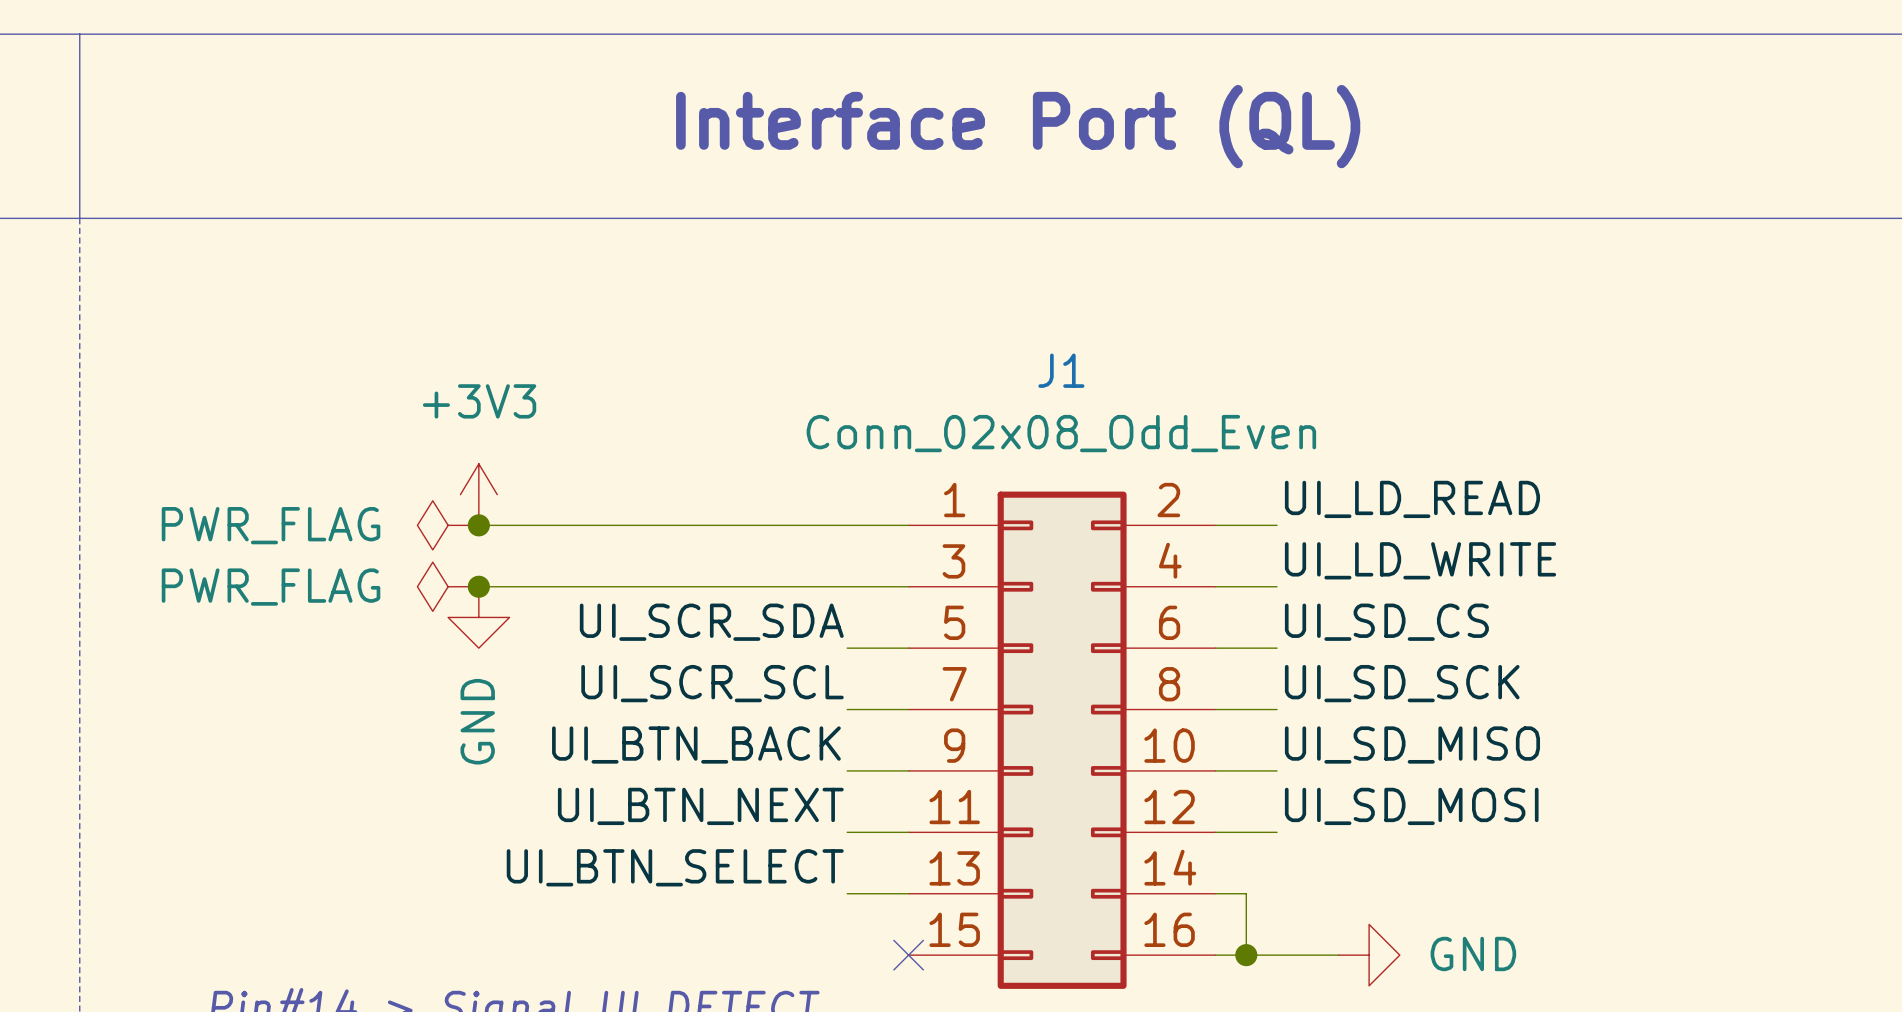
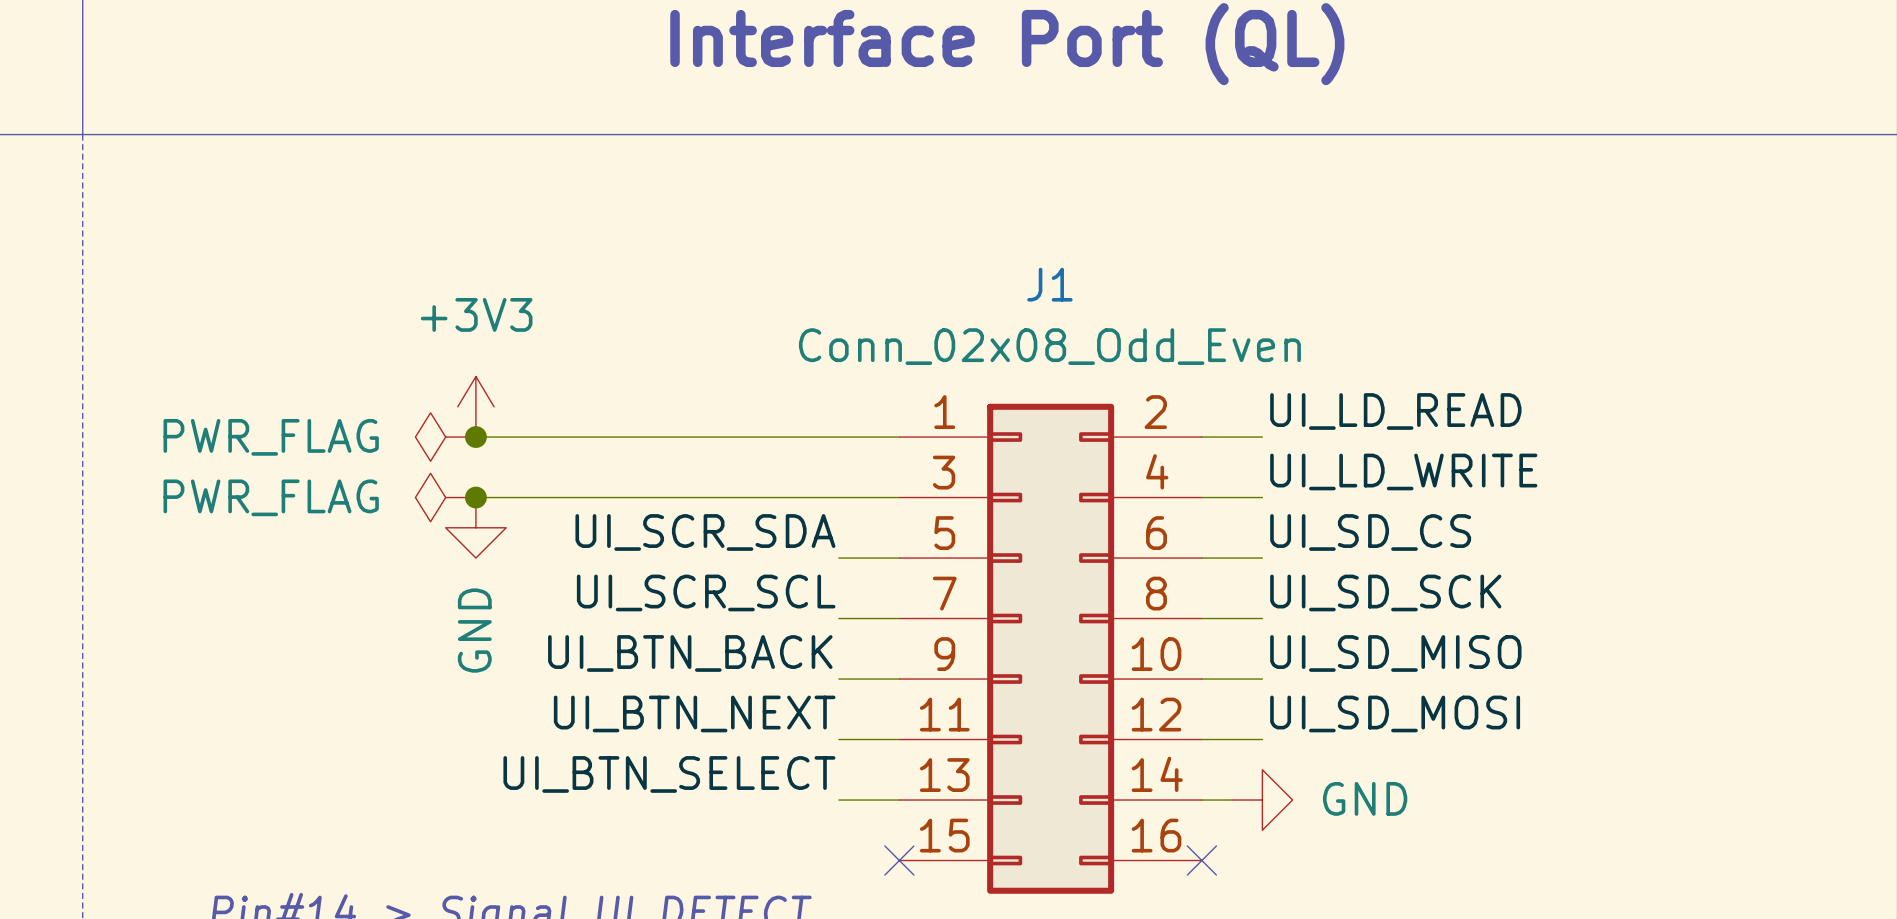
wire: (1246, 893) (1246, 955) -> none
wire: (1215, 955) (1338, 955) -> none
no-connect mark: none -> (1201, 860)
junction: (1246, 955) -> none
power symbol position: GND (1369, 955) -> GND (1262, 800)

